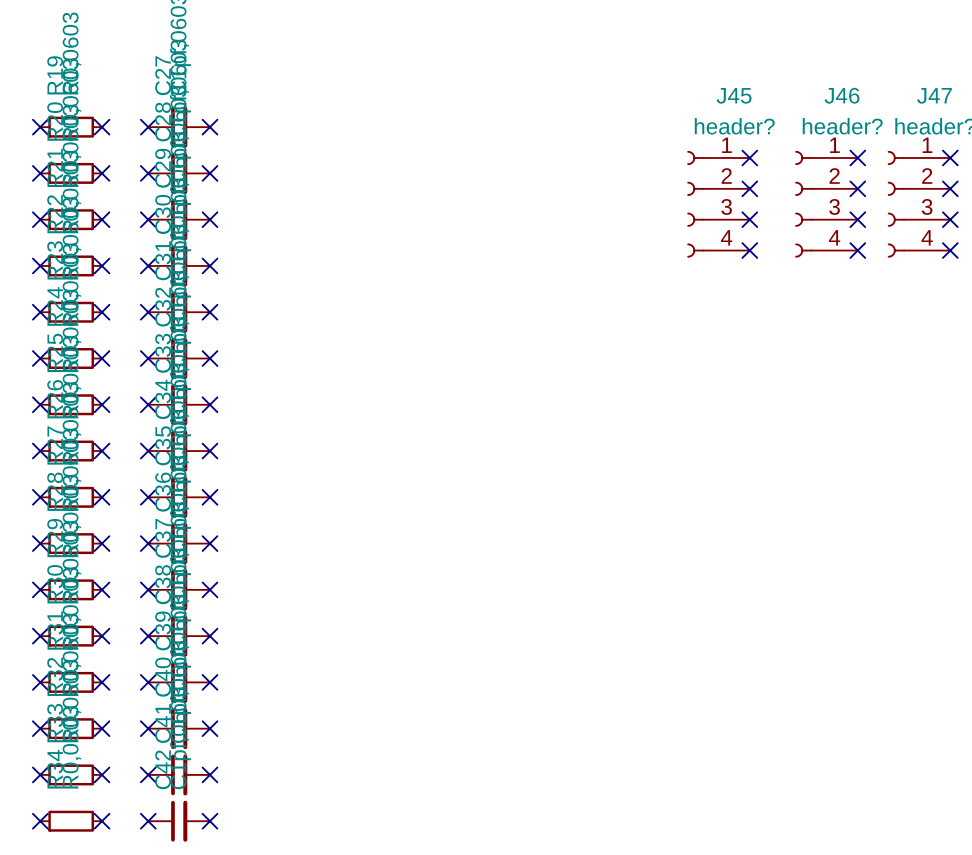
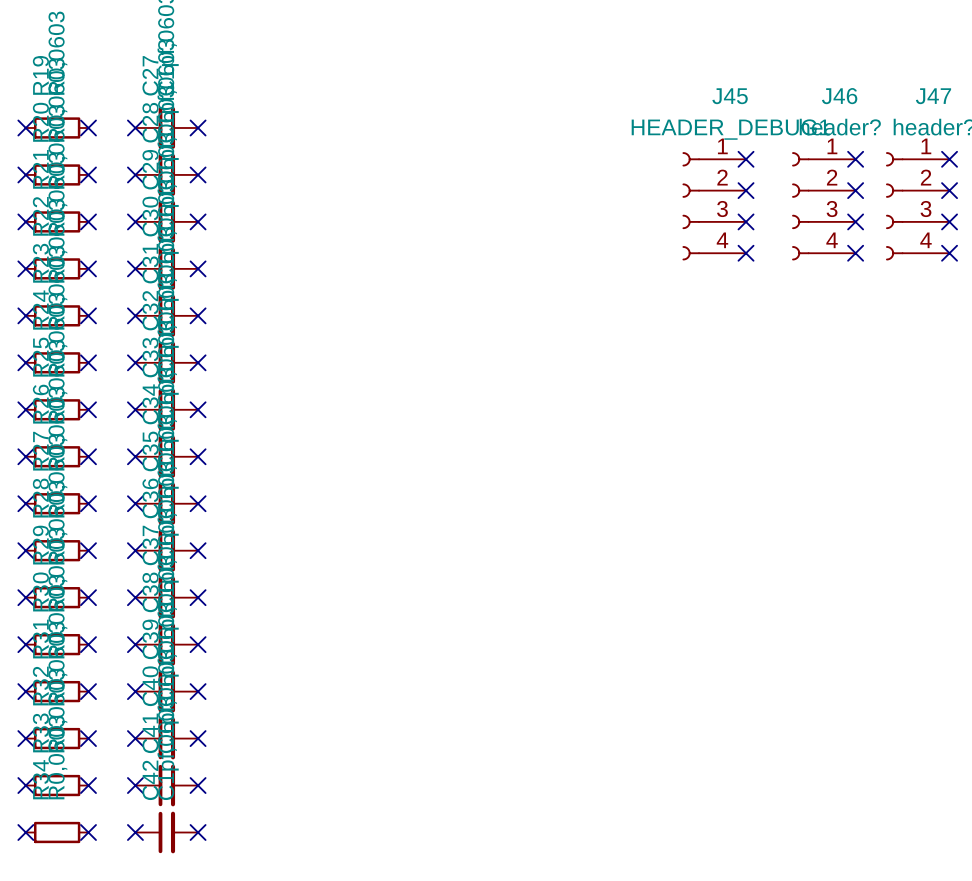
J45 value: header? (734, 126) -> HEADER_DEBUG1 (730, 129)

